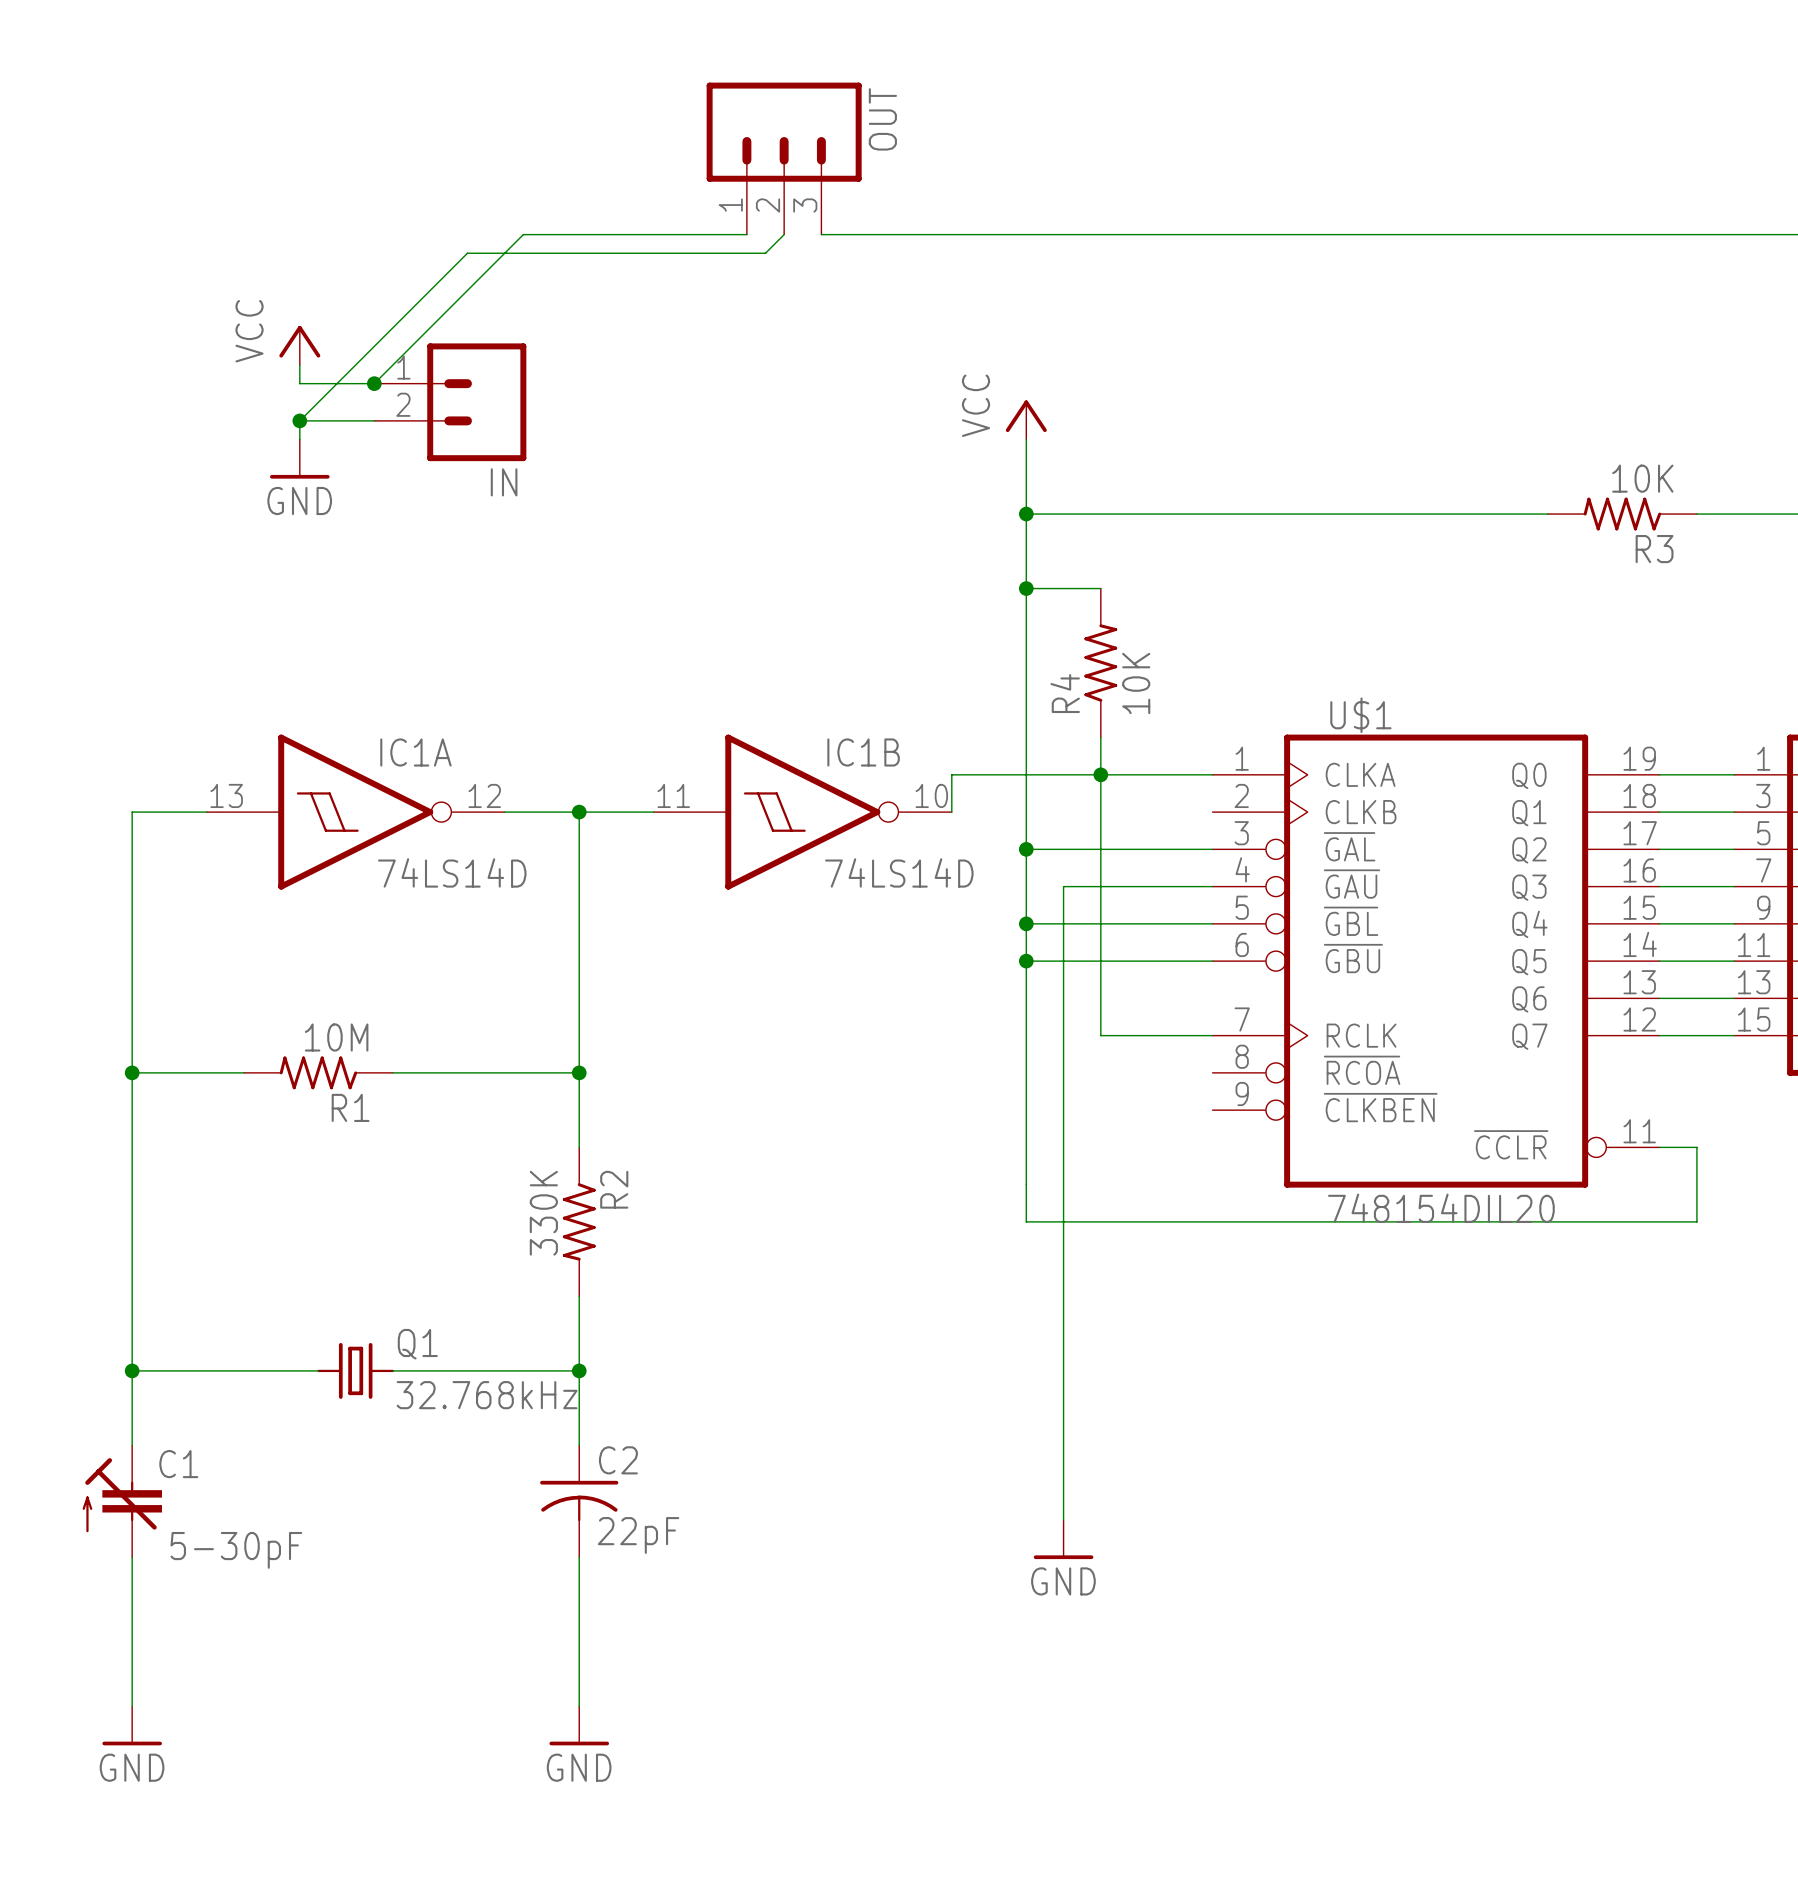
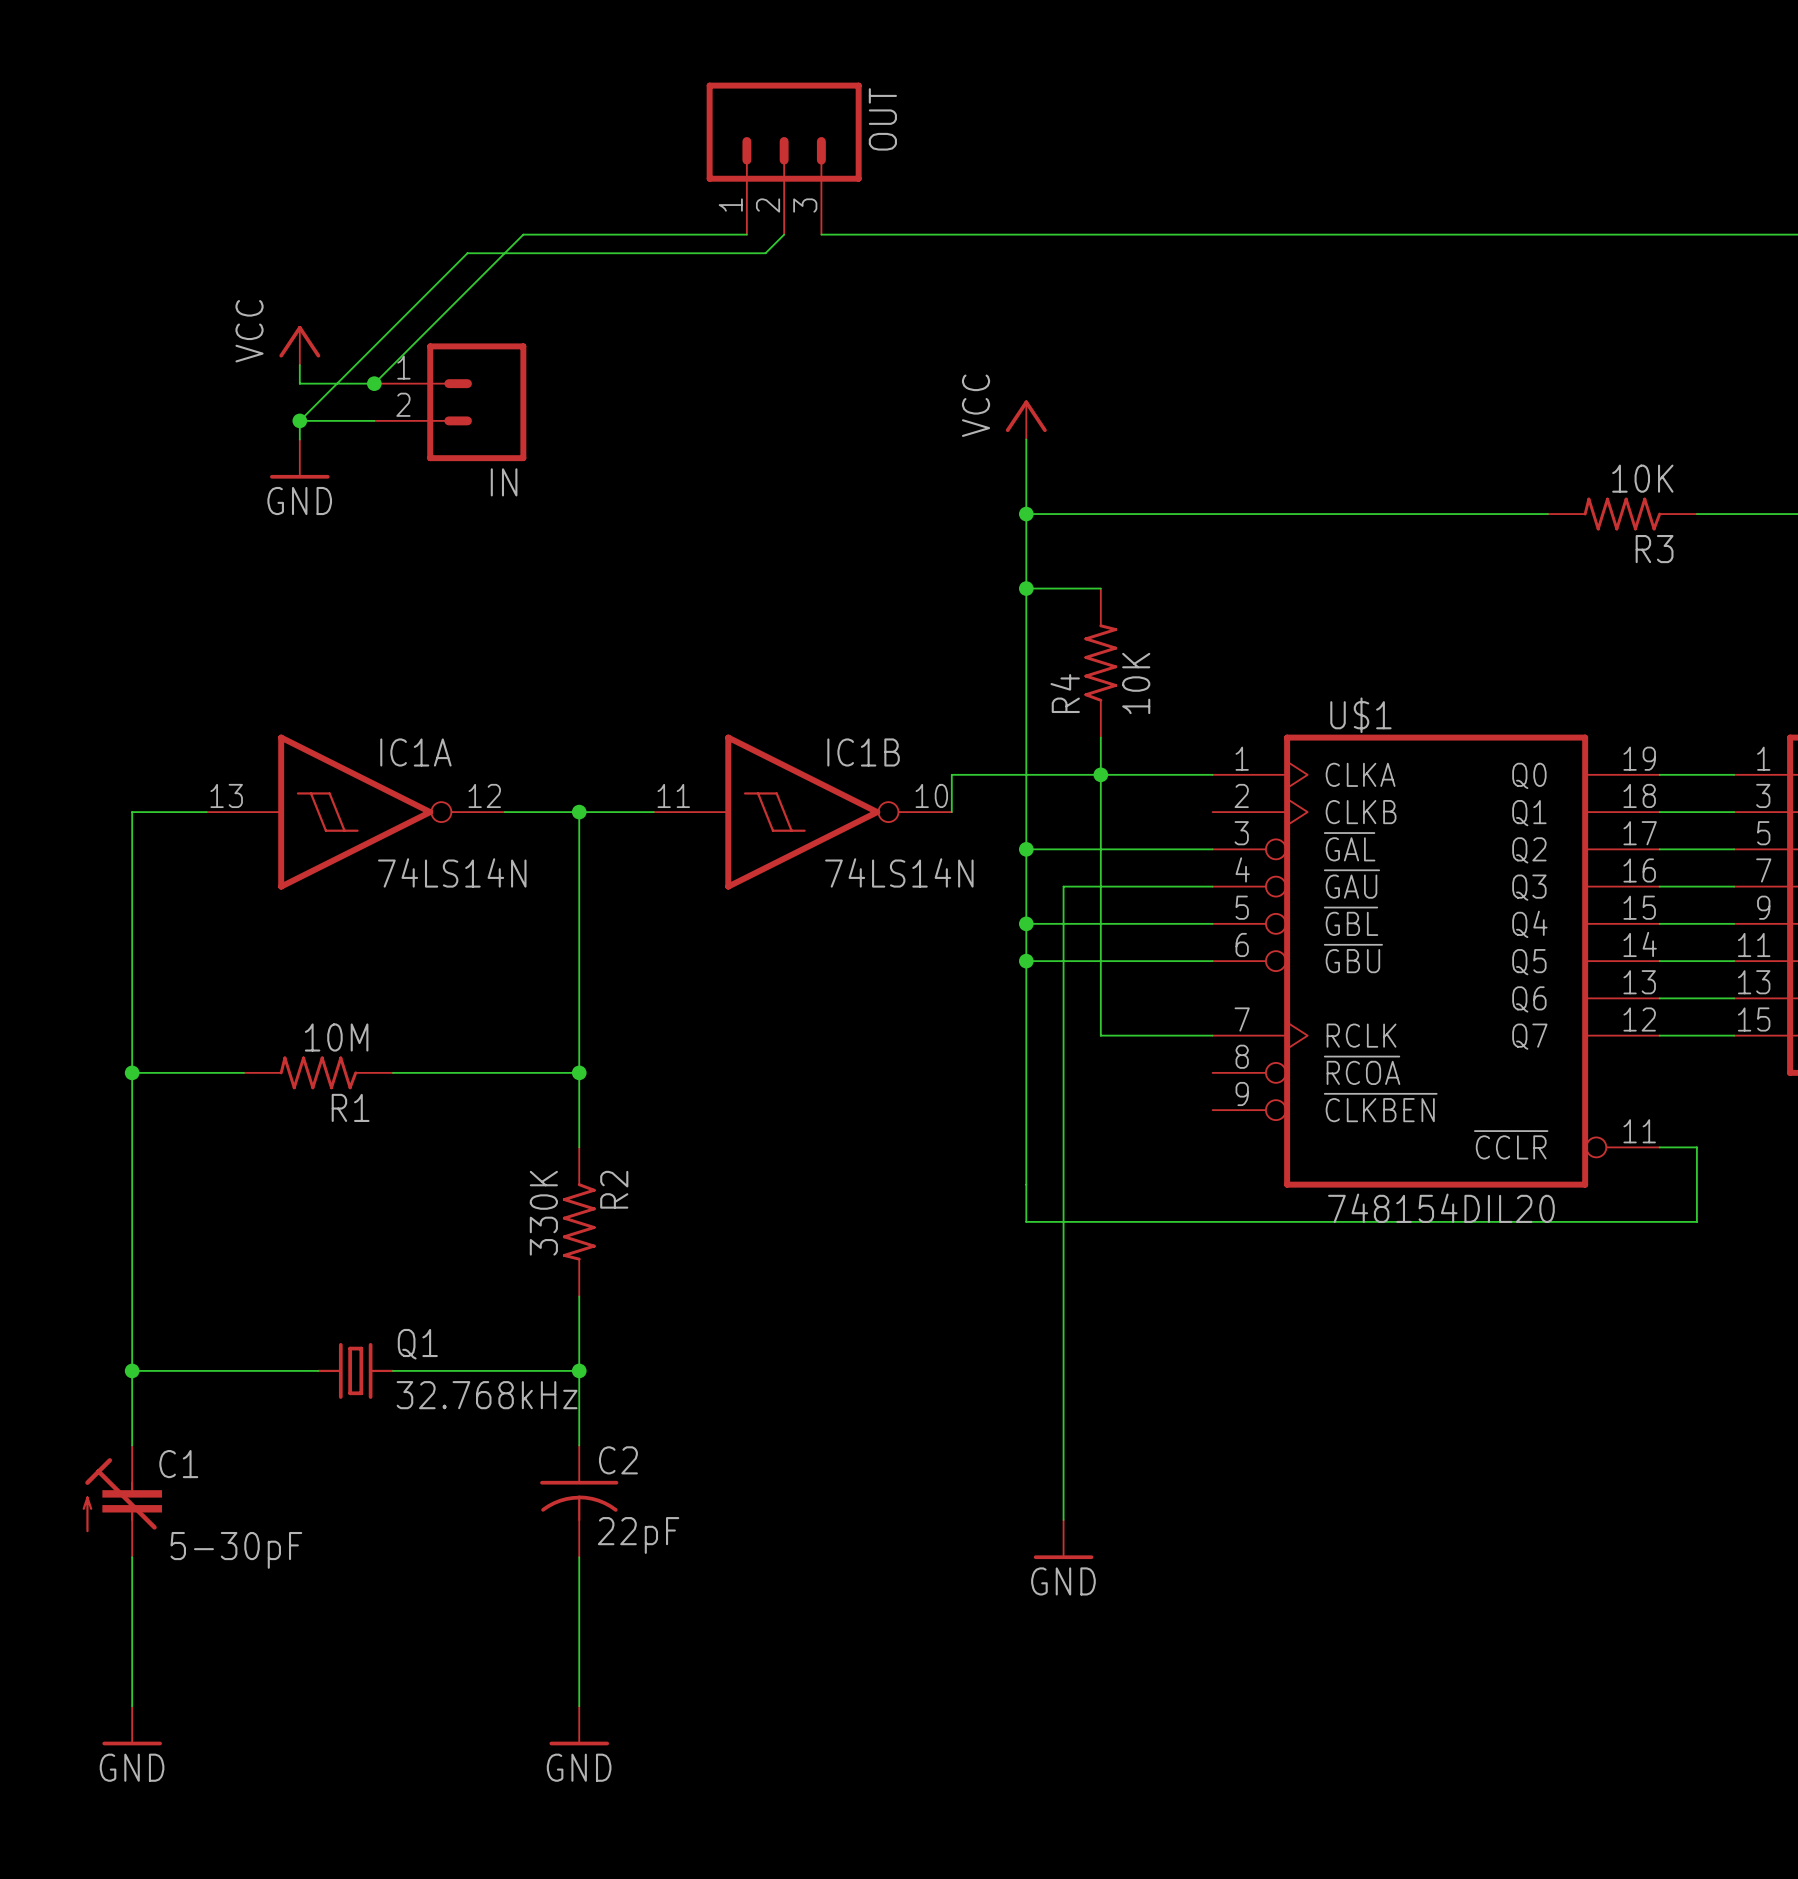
IC1A value: 74LS14D (452, 872) -> 74LS14N (452, 872)
IC1B value: 74LS14D (899, 872) -> 74LS14N (899, 872)

